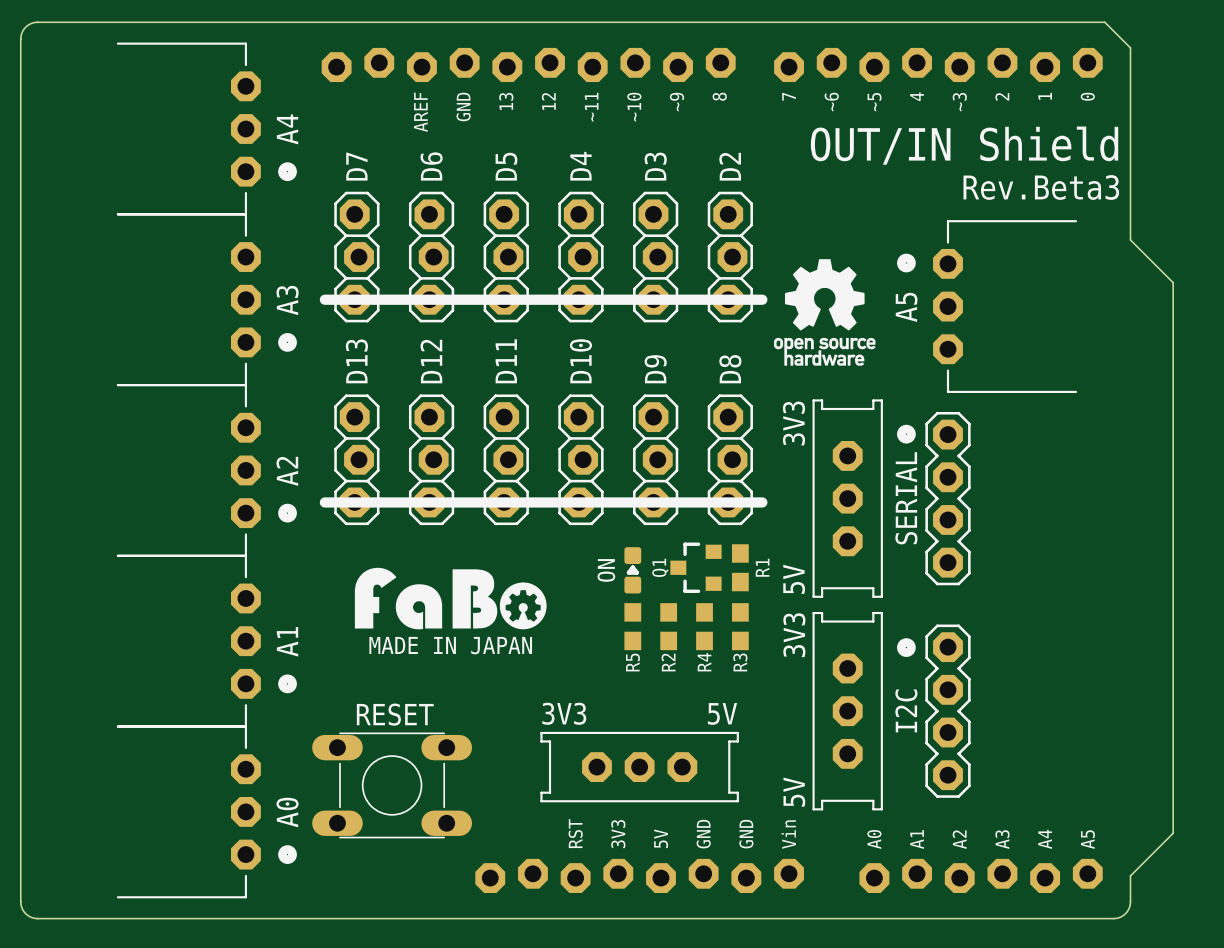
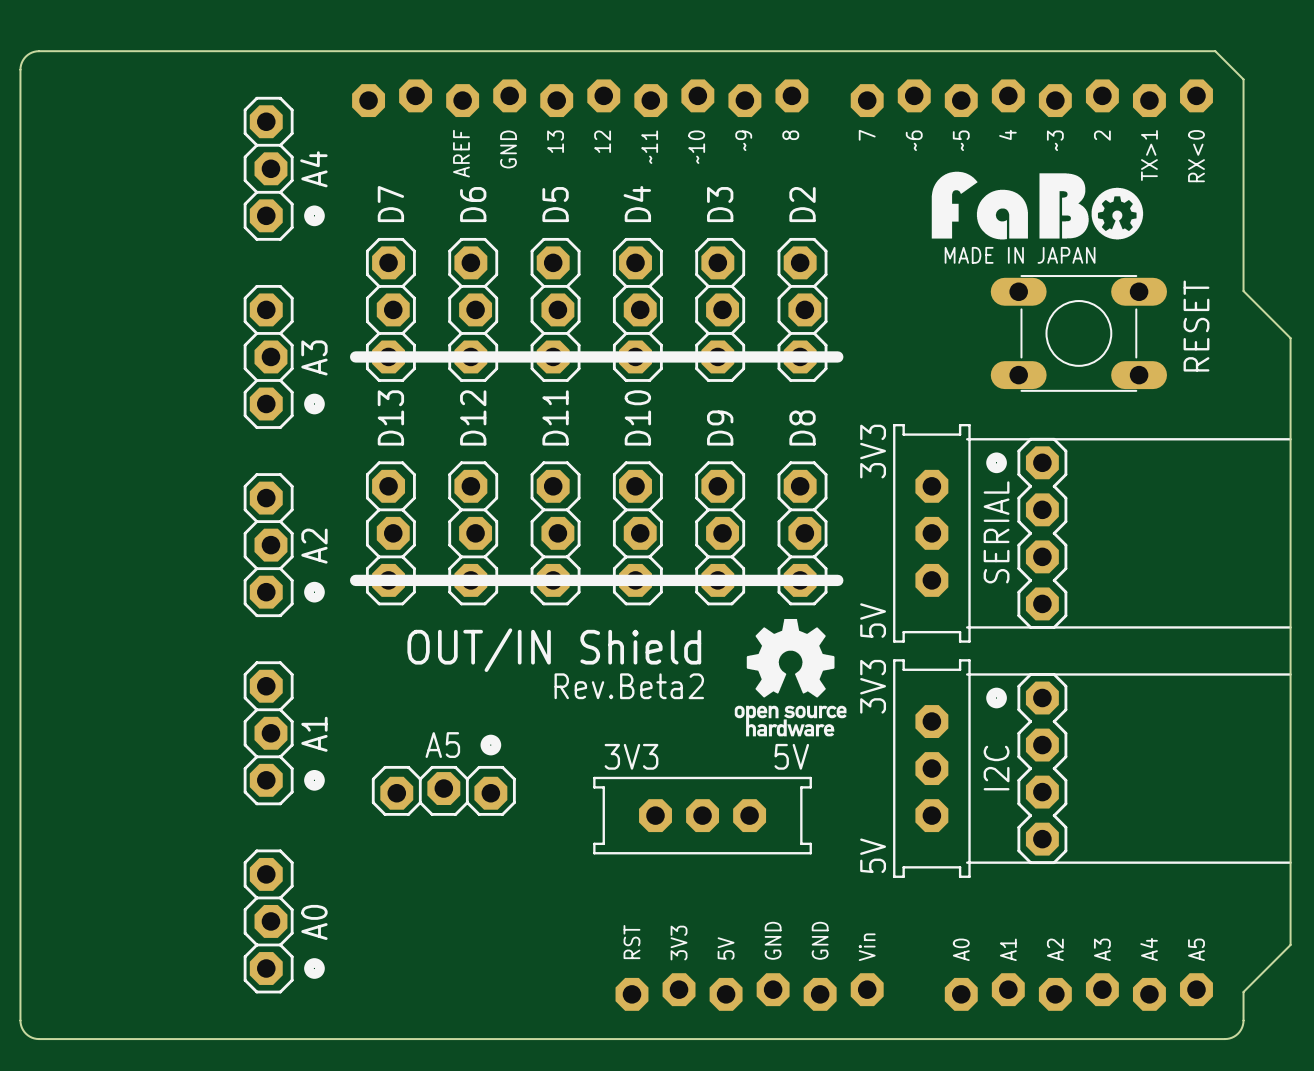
part footprint: [20, 22, 1174, 919] -> [20, 51, 1291, 1040]
text: 1 (1045, 96) -> TX>1 (1149, 155)
text: 0 (1087, 96) -> RX<0 (1196, 156)
part: (188, 129) -> none
part: none -> (268, 168)
drawing: none -> [931, 171, 1144, 240]
text: OUT/IN Shield (964, 145) -> none
text: Rev.Beta3 (1041, 187) -> none
text: none -> MADE IN JAPAN (1020, 255)
drawing: [897, 253, 916, 273] -> none
text: none -> RESET (1196, 326)
part: none -> (1078, 333)
part: (188, 299) -> none
part: none -> (268, 356)
part: (1005, 306) -> none
text: A5 (906, 307) -> none
drawing position: (824, 312) -> (790, 677)
line: none -> (967, 439) (1290, 439)
text position: 3V3 (793, 423) -> 3V3 (873, 451)
drawing position: (906, 434) -> (996, 462)
part: (188, 470) -> none
part: none -> (268, 545)
part position: (847, 498) -> (931, 533)
text position: SERIAL (906, 498) -> SERIAL (996, 532)
part position: (948, 498) -> (1042, 533)
line: none -> (967, 627) (1290, 627)
text: none -> OUT/IN Shield (554, 650)
drawing: [354, 567, 547, 630] -> none
Q1: (696, 567) -> none
R1: (740, 567) -> none
ON: (632, 570) -> none
text position: 5V (794, 579) -> 5V (873, 620)
line: none -> (967, 674) (1290, 674)
text: none -> Rev.Beta2 (629, 686)
R5: (632, 626) -> none
R2: (668, 626) -> none
R4: (704, 626) -> none
R3: (740, 626) -> none
text position: 3V3 (794, 635) -> 3V3 (873, 686)
part: (188, 641) -> none
part: none -> (268, 733)
drawing: none -> [480, 734, 502, 756]
text: MADE IN JAPAN (450, 645) -> none
drawing position: (906, 647) -> (996, 698)
text: none -> A5 (442, 745)
text: none -> 5V (791, 756)
part: none -> (443, 790)
text position: I2C (906, 710) -> I2C (996, 768)
part position: (847, 711) -> (931, 768)
part position: (948, 711) -> (1042, 768)
text position: 3V3 (564, 713) -> 3V3 (631, 756)
text: 5V (722, 713) -> none
text: RESET (395, 714) -> none
line: none -> (967, 862) (1290, 862)
part position: (639, 767) -> (702, 815)
part: (392, 785) -> none
text position: 5V (794, 792) -> 5V (873, 855)
part: (188, 811) -> none
part: none -> (268, 921)

